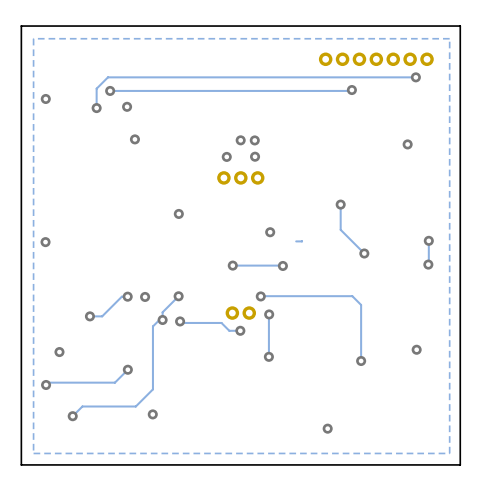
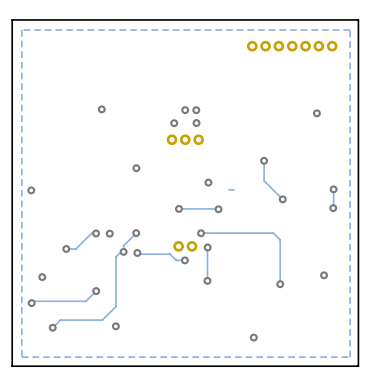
track: (415, 77) (107, 77) (96, 88) (96, 108) -> none
via: (415, 77) -> none
via: (110, 90) -> none
track: (351, 90) (110, 90) -> none
via: (351, 90) -> none
via: (45, 98) -> none
via: (127, 106) -> none
via: (96, 108) -> none

